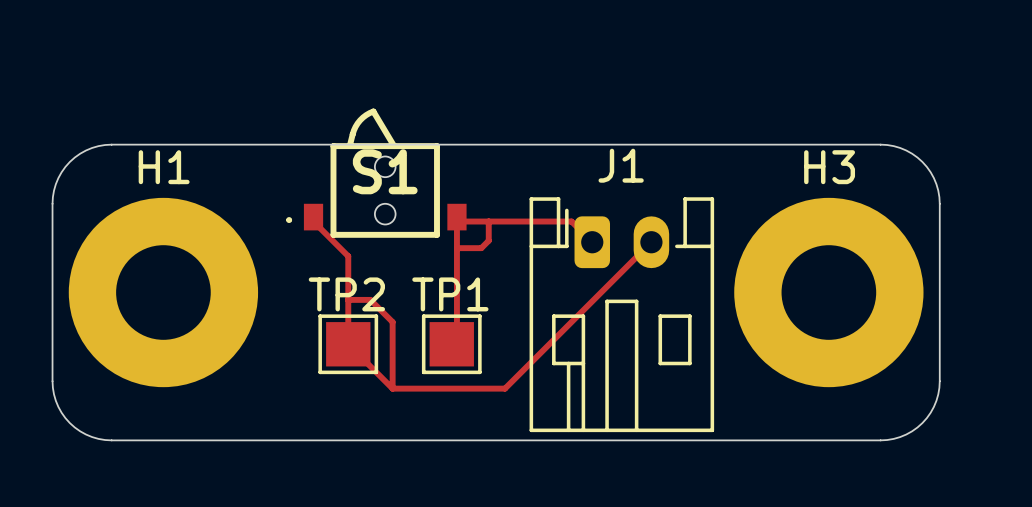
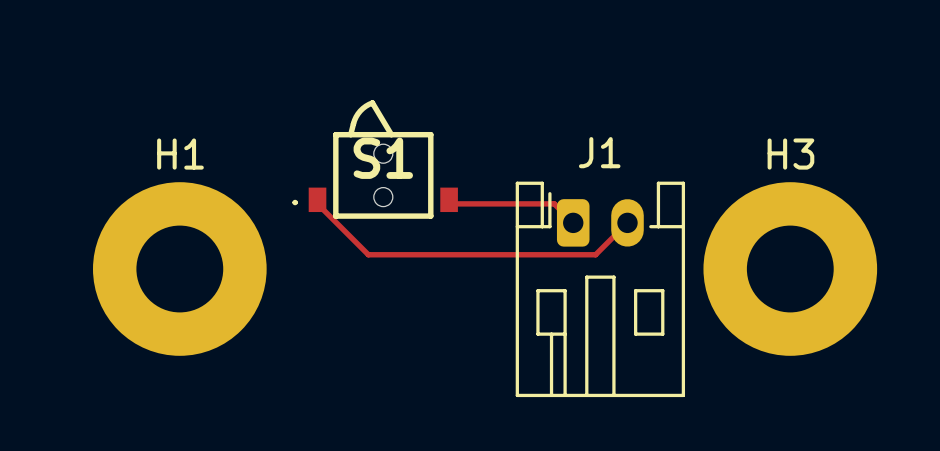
board edge: (111, 144) (880, 144) (900, 147) (917, 157) (926, 166) (933, 178) (939, 197) (939, 381) (936, 400) (930, 412) (917, 427) (900, 437) (880, 440) (111, 440) (92, 437) (80, 431) (65, 418) (58, 406) (52, 387) (52, 197) (58, 178) (69, 161) (86, 150) (111, 144) -> none
top track: (456, 221) (456, 331) (451, 336) (451, 344) -> none
top track: (488, 221) (488, 240) (481, 248) (456, 248) -> none
top track: (348, 256) (348, 344) (392, 388) -> none
top track: (616, 276) (505, 388) (392, 388) -> (595, 254) (368, 254) (349, 235)
top track: (348, 299) (370, 299) (392, 322) (392, 388) -> none
TP2: (348, 344) -> none
TP1: (451, 344) -> none

